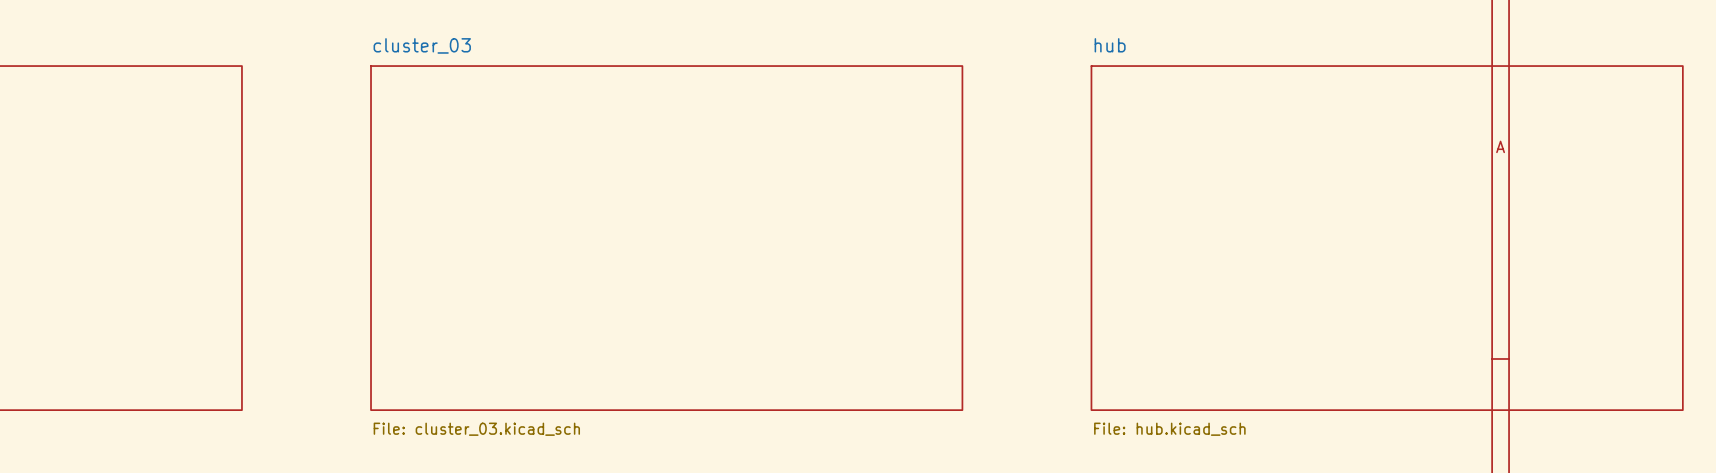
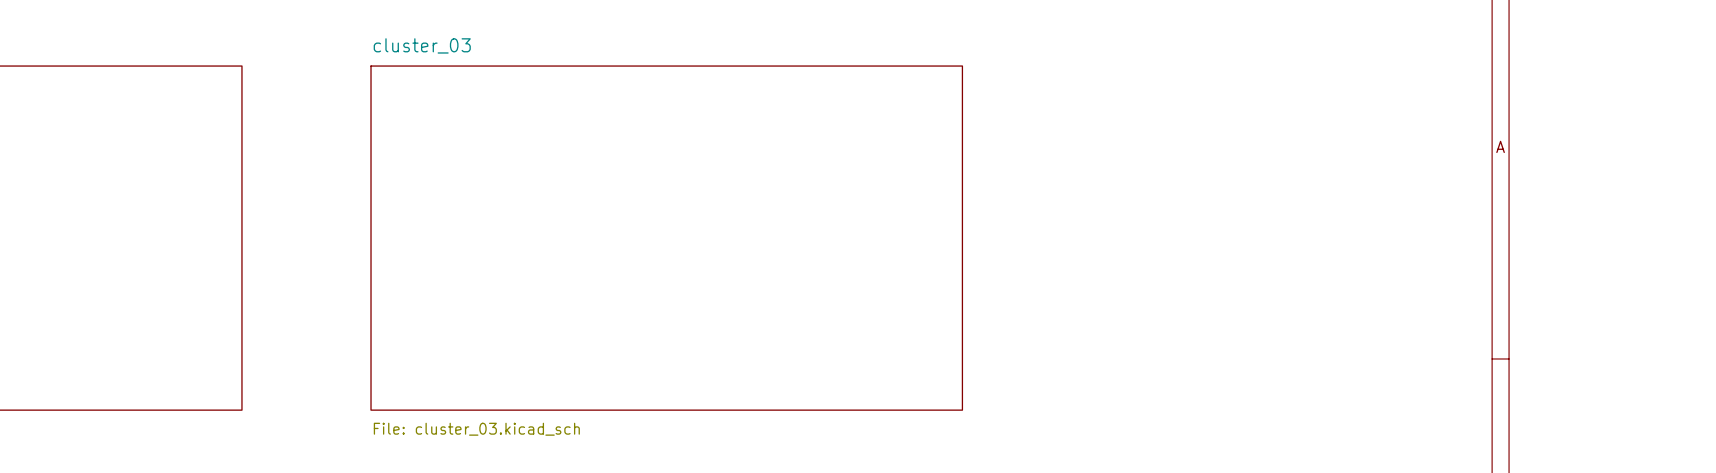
sheet hub: File: hub.kicad_sch (1387, 238) -> none

